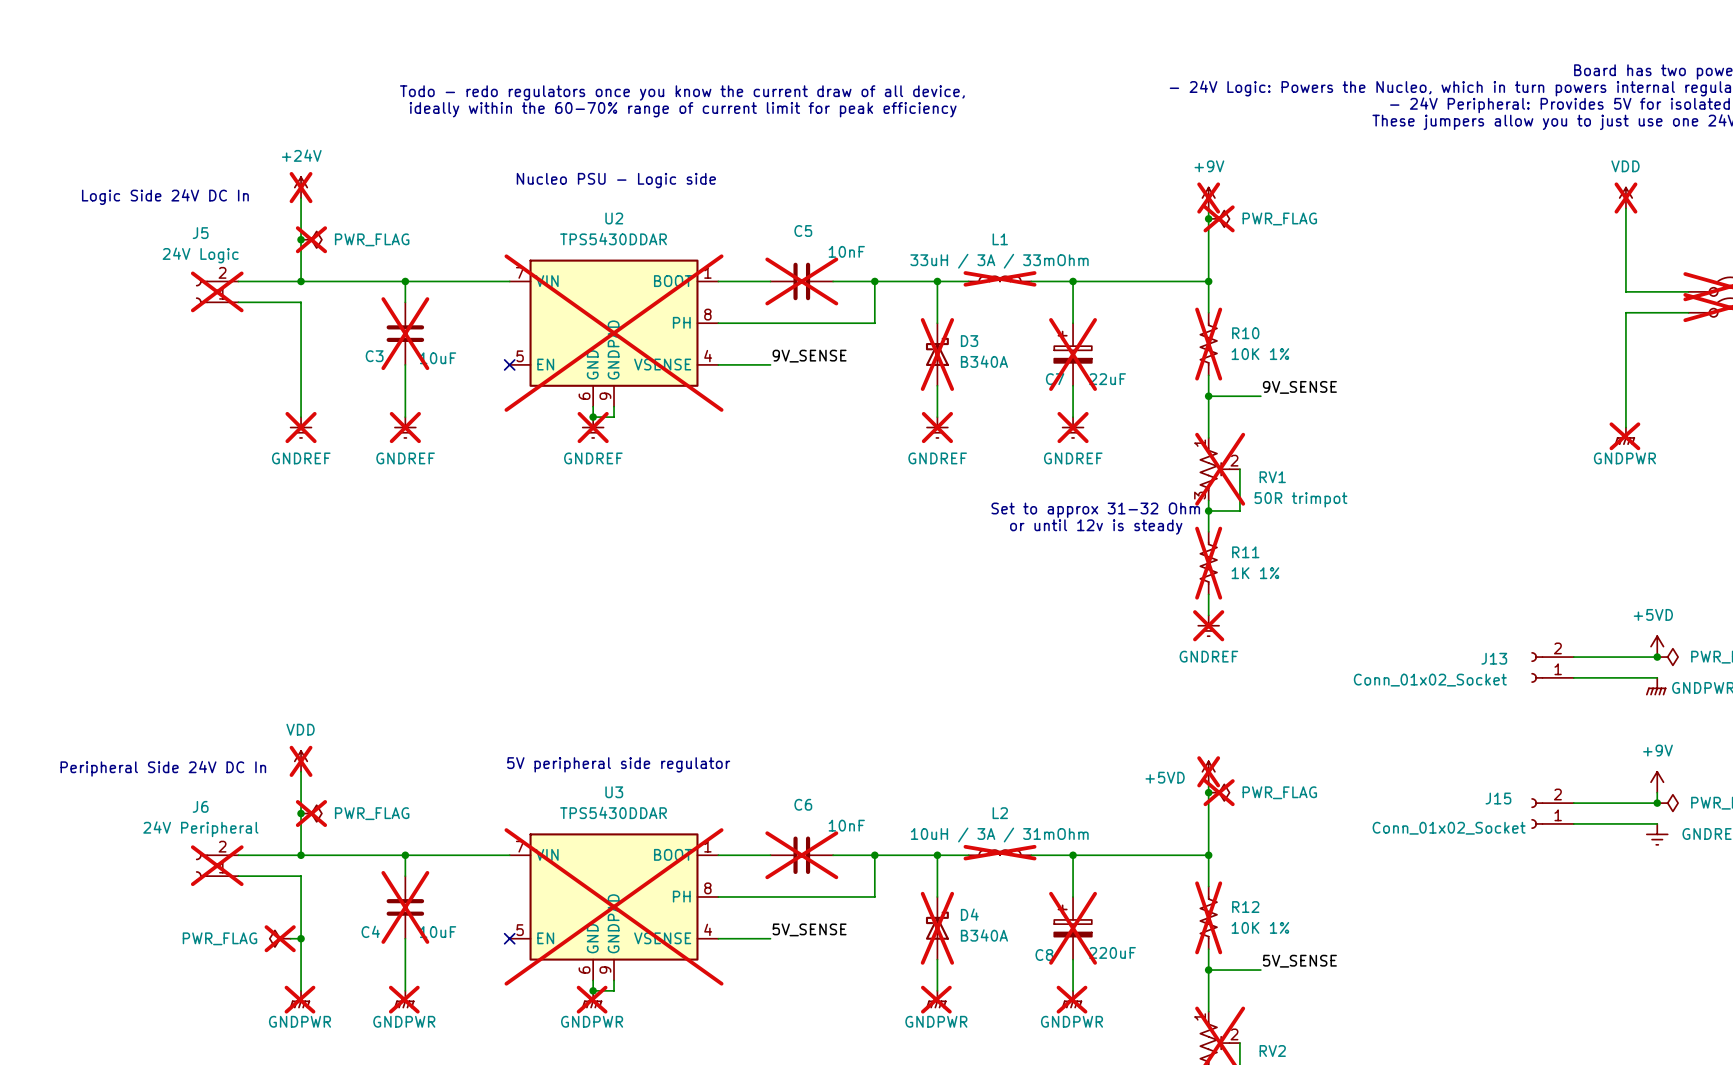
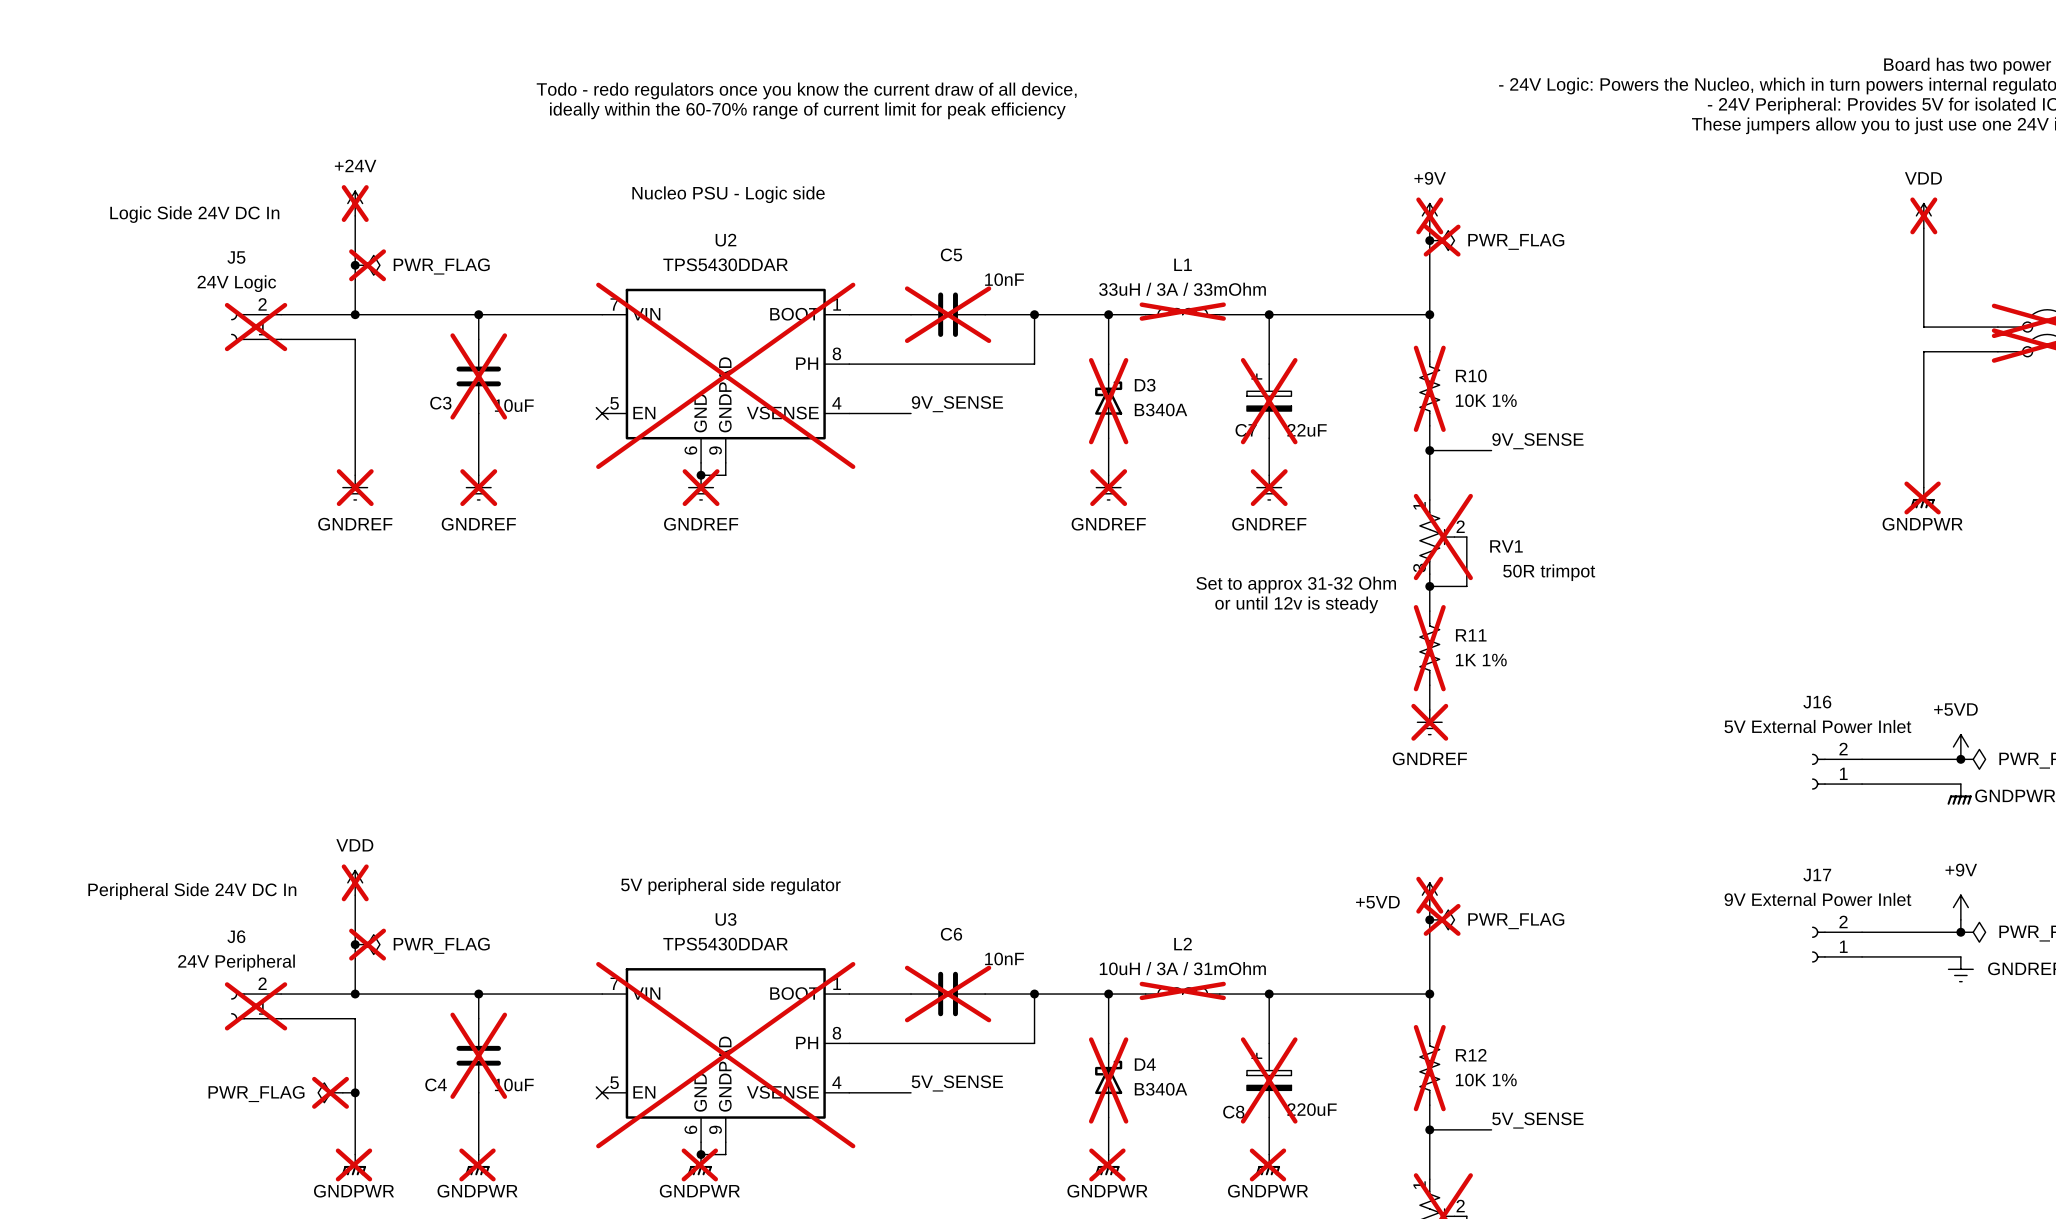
J13 name: J13 (1494, 658) -> J16 (1817, 702)
J13 value: Conn_01x02_Socket (1430, 680) -> 5V External Power Inlet (1817, 726)
J15 name: J15 (1498, 798) -> J17 (1817, 875)
J15 value: Conn_01x02_Socket (1449, 828) -> 9V External Power Inlet (1817, 899)

